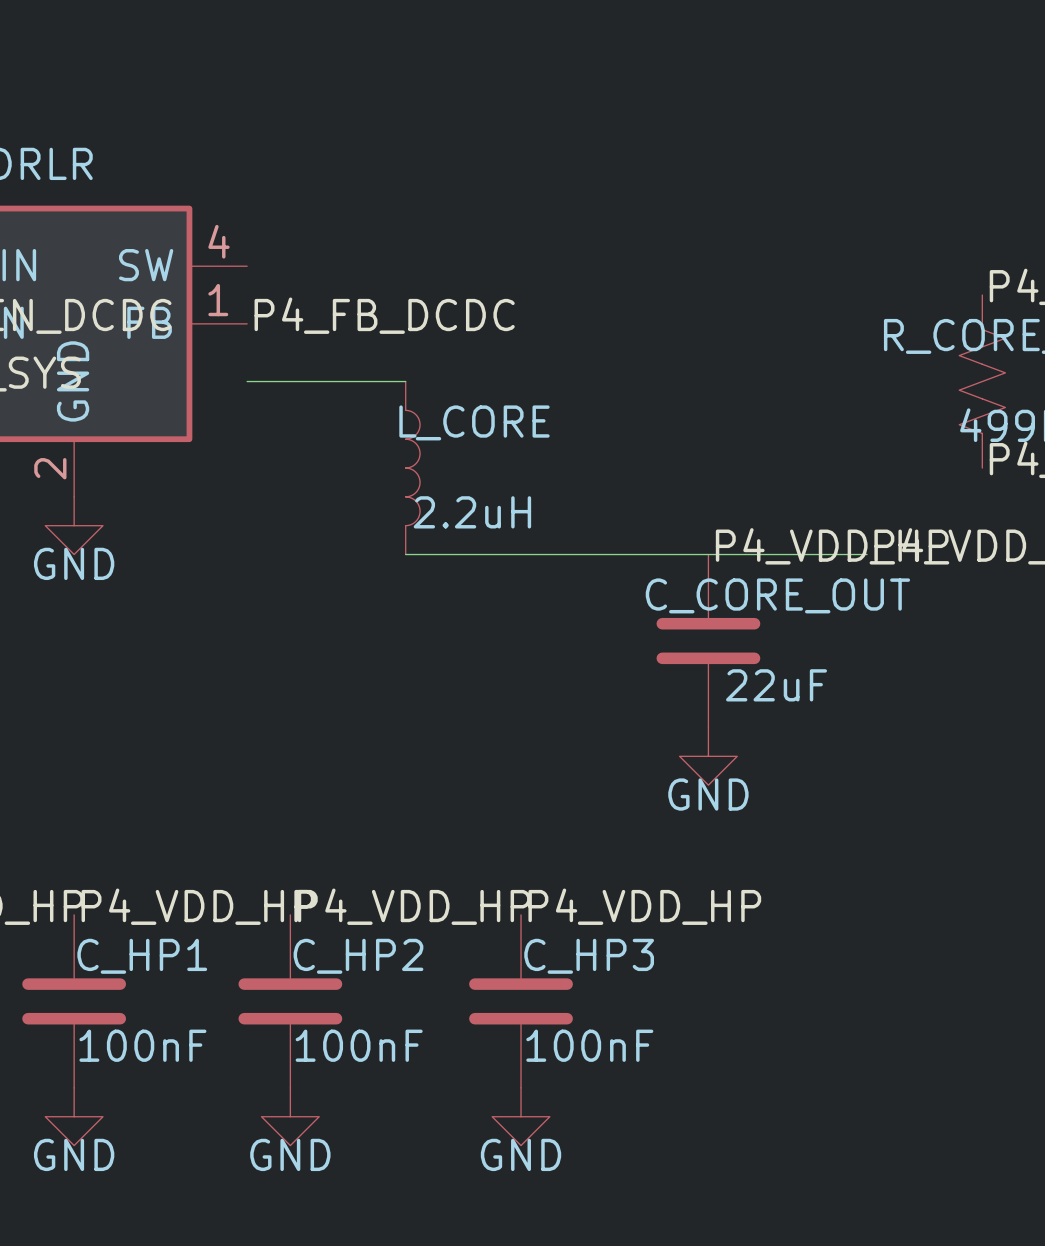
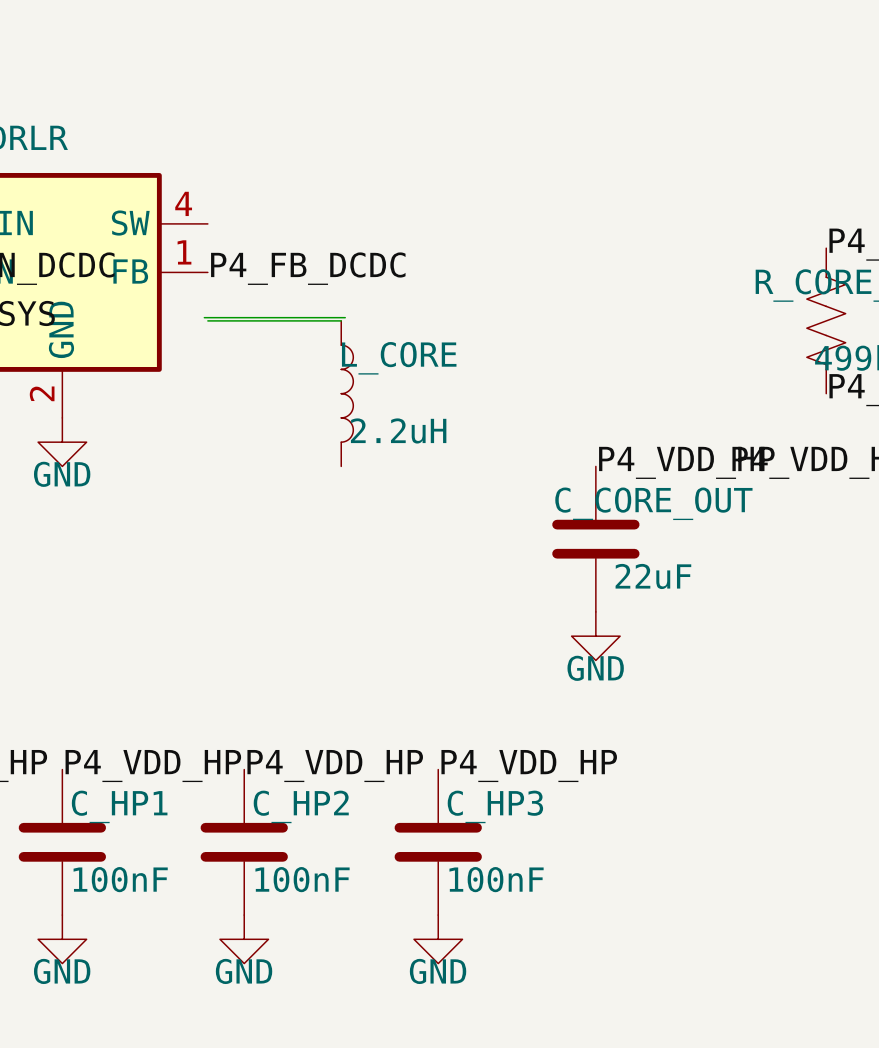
wire: none -> (204, 317) (345, 317)
wire: (405, 554) (866, 554) -> none

